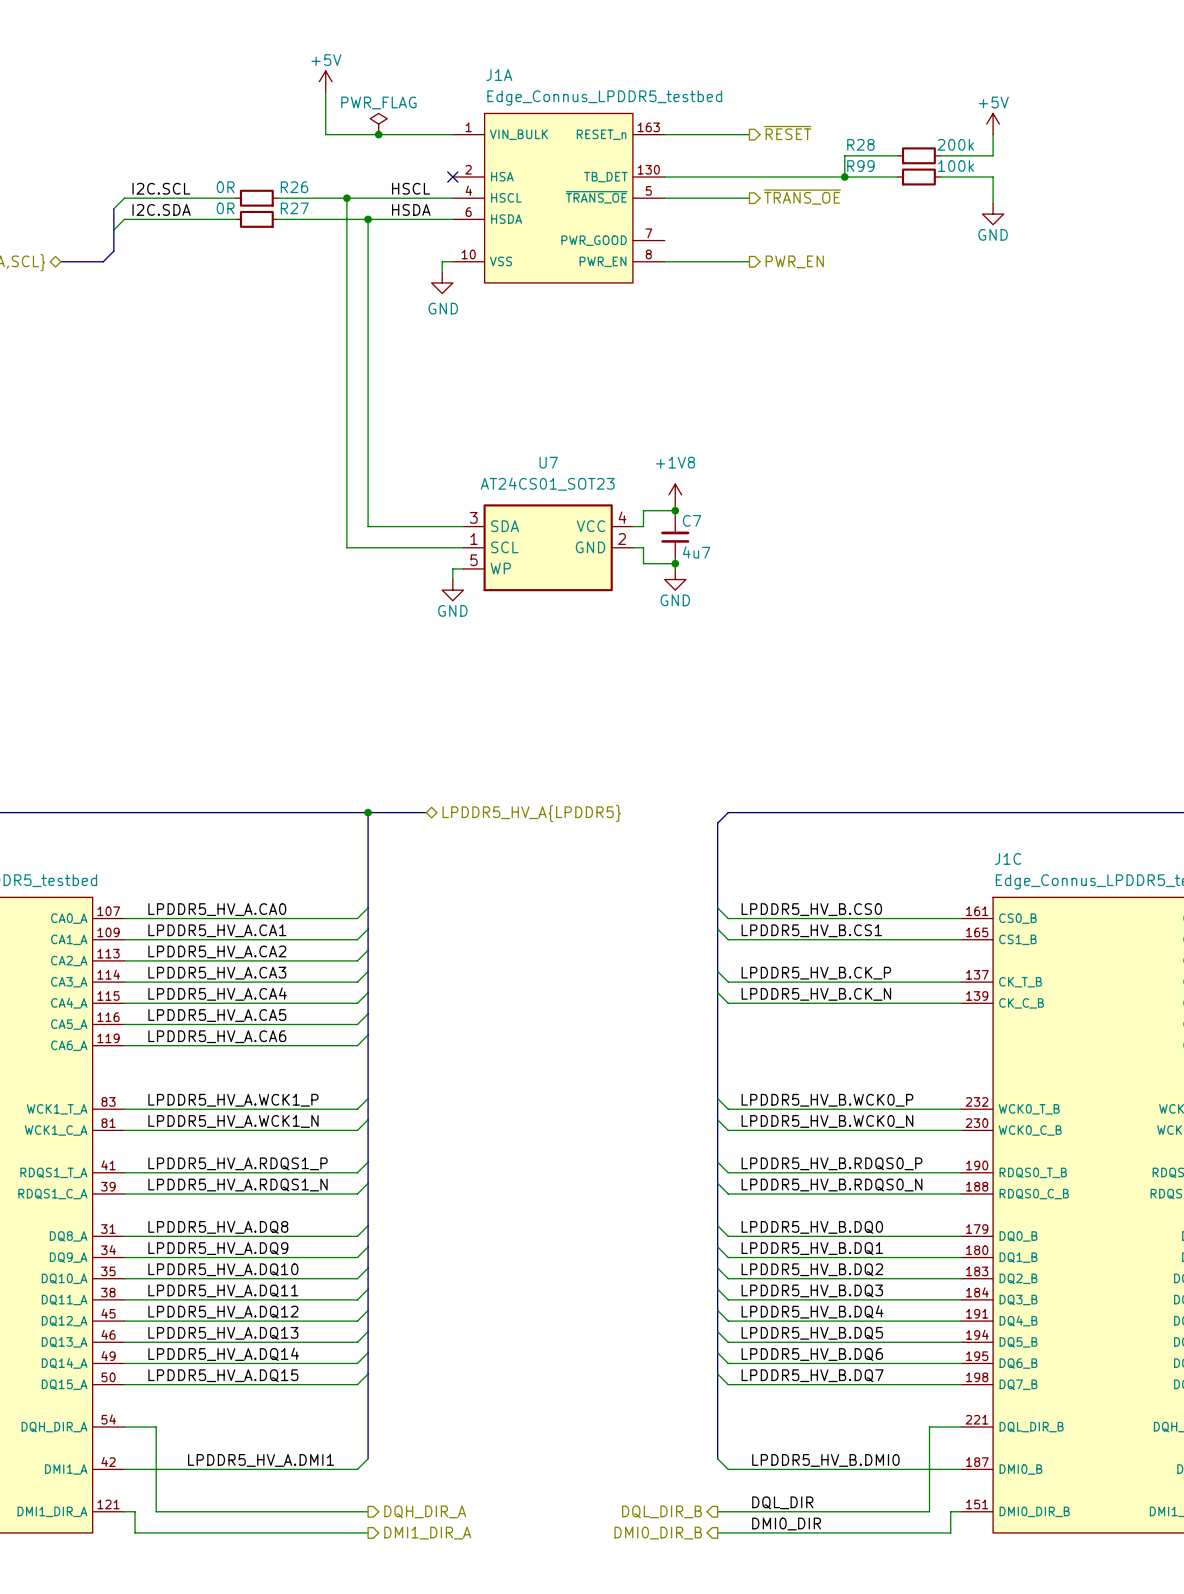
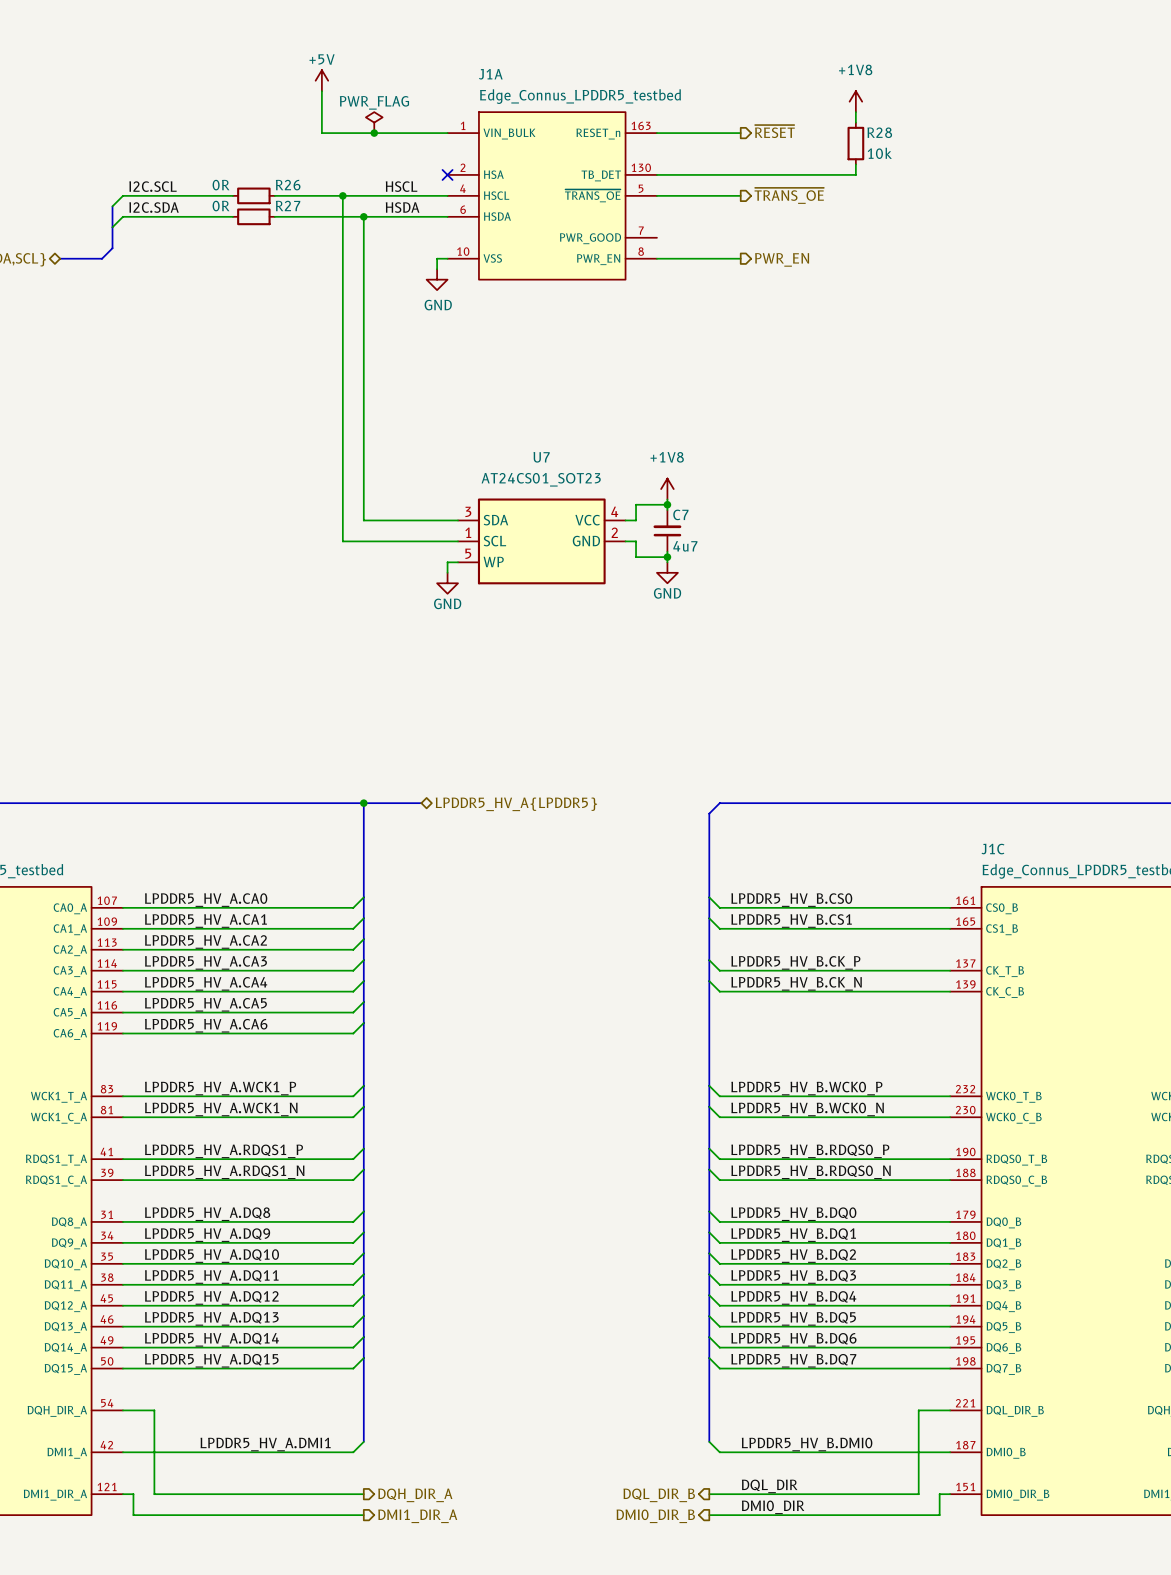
power symbol: none -> +1V8 (855, 101)
wire: none -> (855, 112) (855, 122)
power symbol: +5V (993, 124) -> none
wire: (993, 134) (993, 155) (940, 155) -> none
R28 name position: R28 (860, 144) -> R28 (879, 132)
R28 text: 200k (955, 144) -> 10k (879, 153)
wire: (897, 155) (844, 155) (844, 177) -> none
R28 rotation: 0° (918, 155) -> 90° clockwise (855, 143)
R28 position: (918, 155) -> (855, 143)
junction: (844, 177) -> none
wire: (865, 177) (897, 177) -> (855, 174) (855, 164)
R99: (918, 177) -> none
wire: (940, 177) (993, 177) (993, 203) -> none
power symbol: GND (993, 214) -> none

